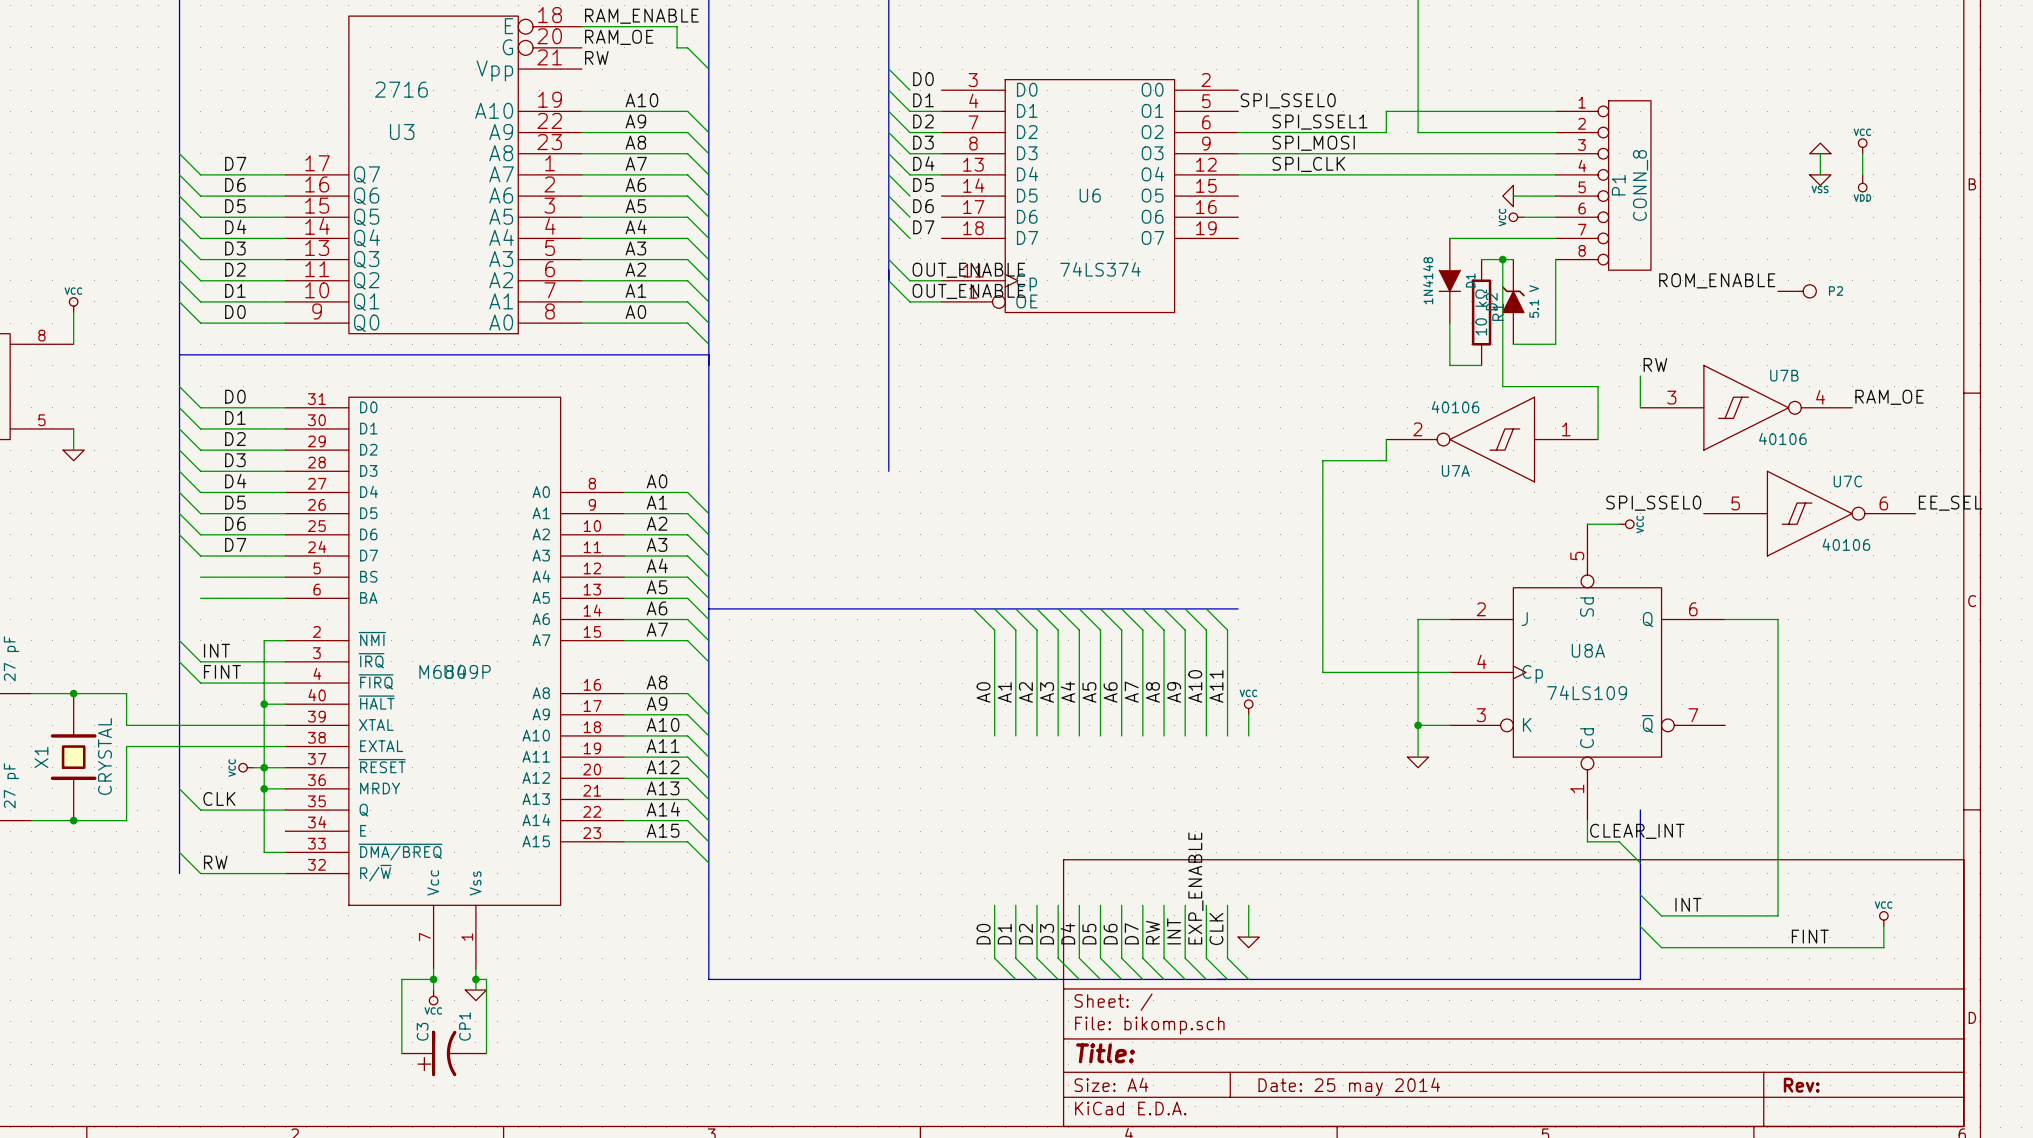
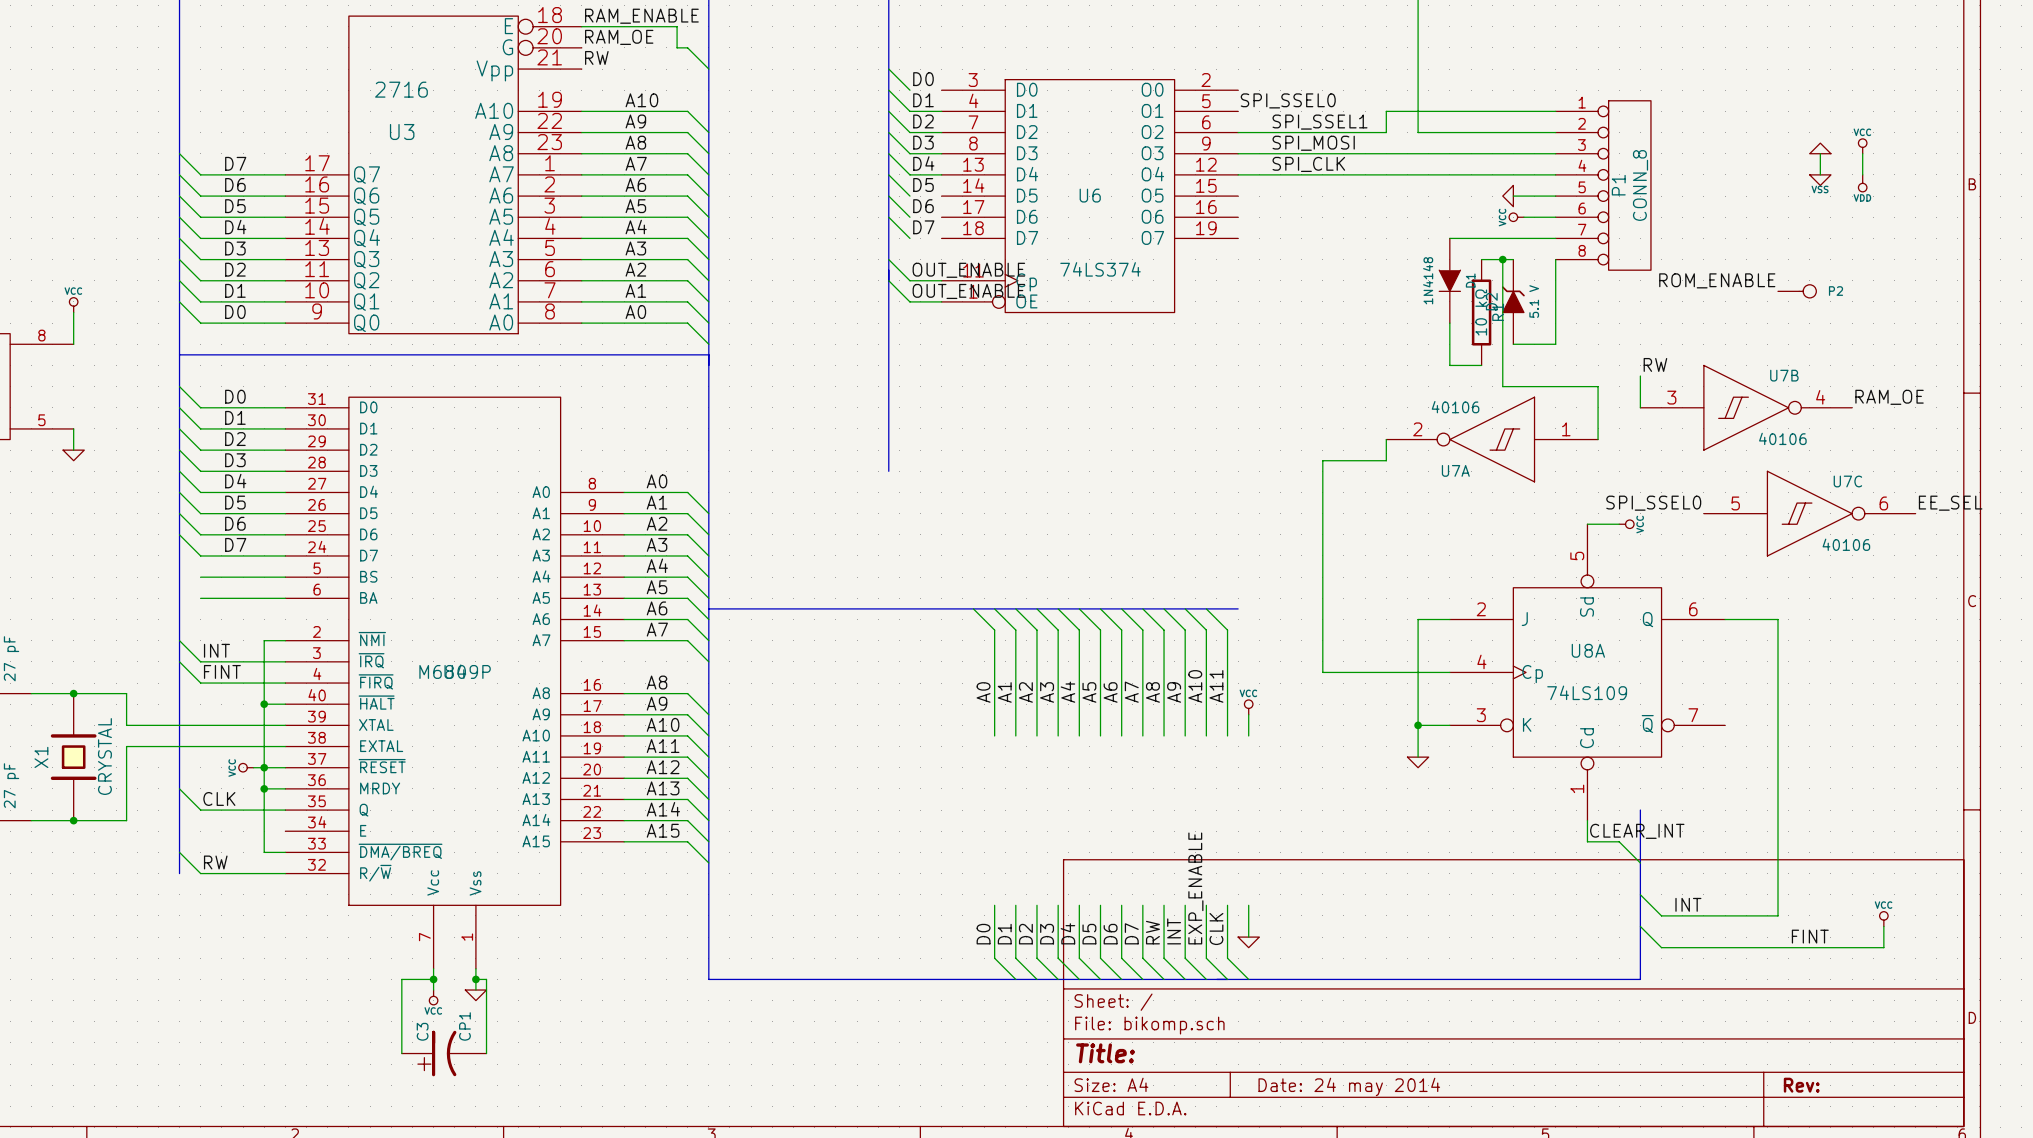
title block: Date: 25 may 2014 (1349, 1086) -> Date: 24 may 2014 (1349, 1086)

